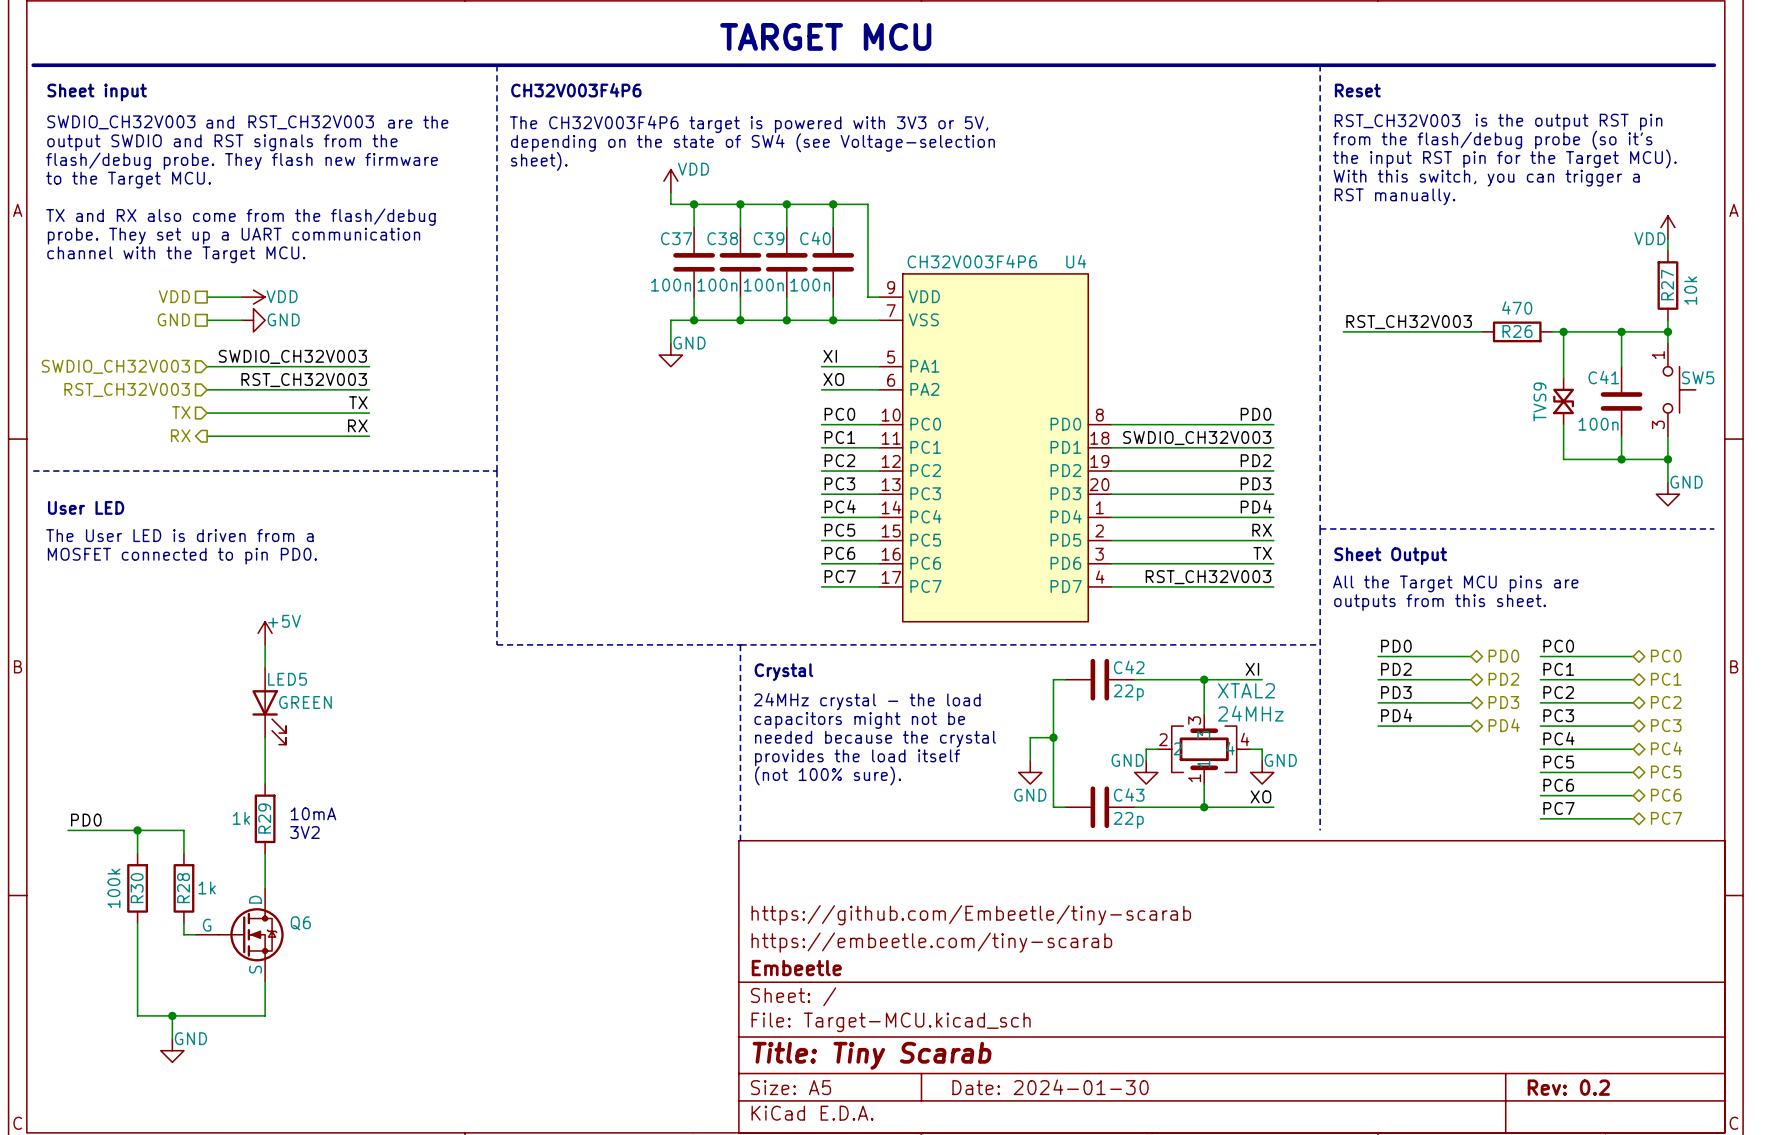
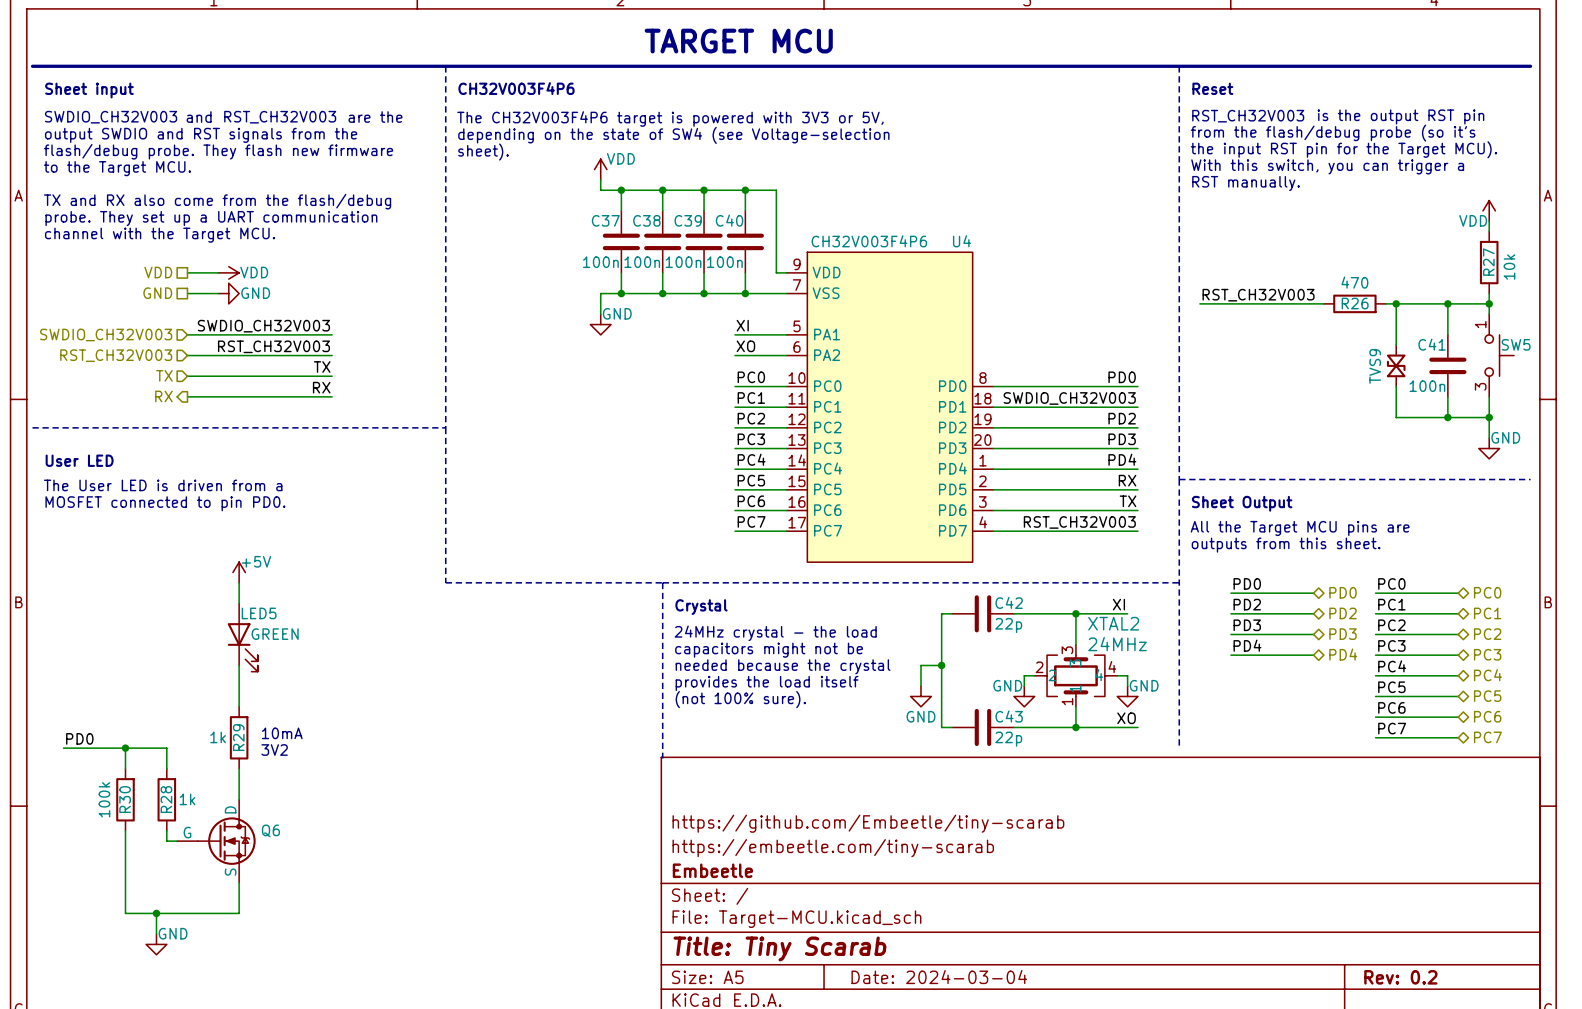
title block: Date: 2024-01-30 (1050, 1087) -> Date: 2024-03-04 (939, 977)

